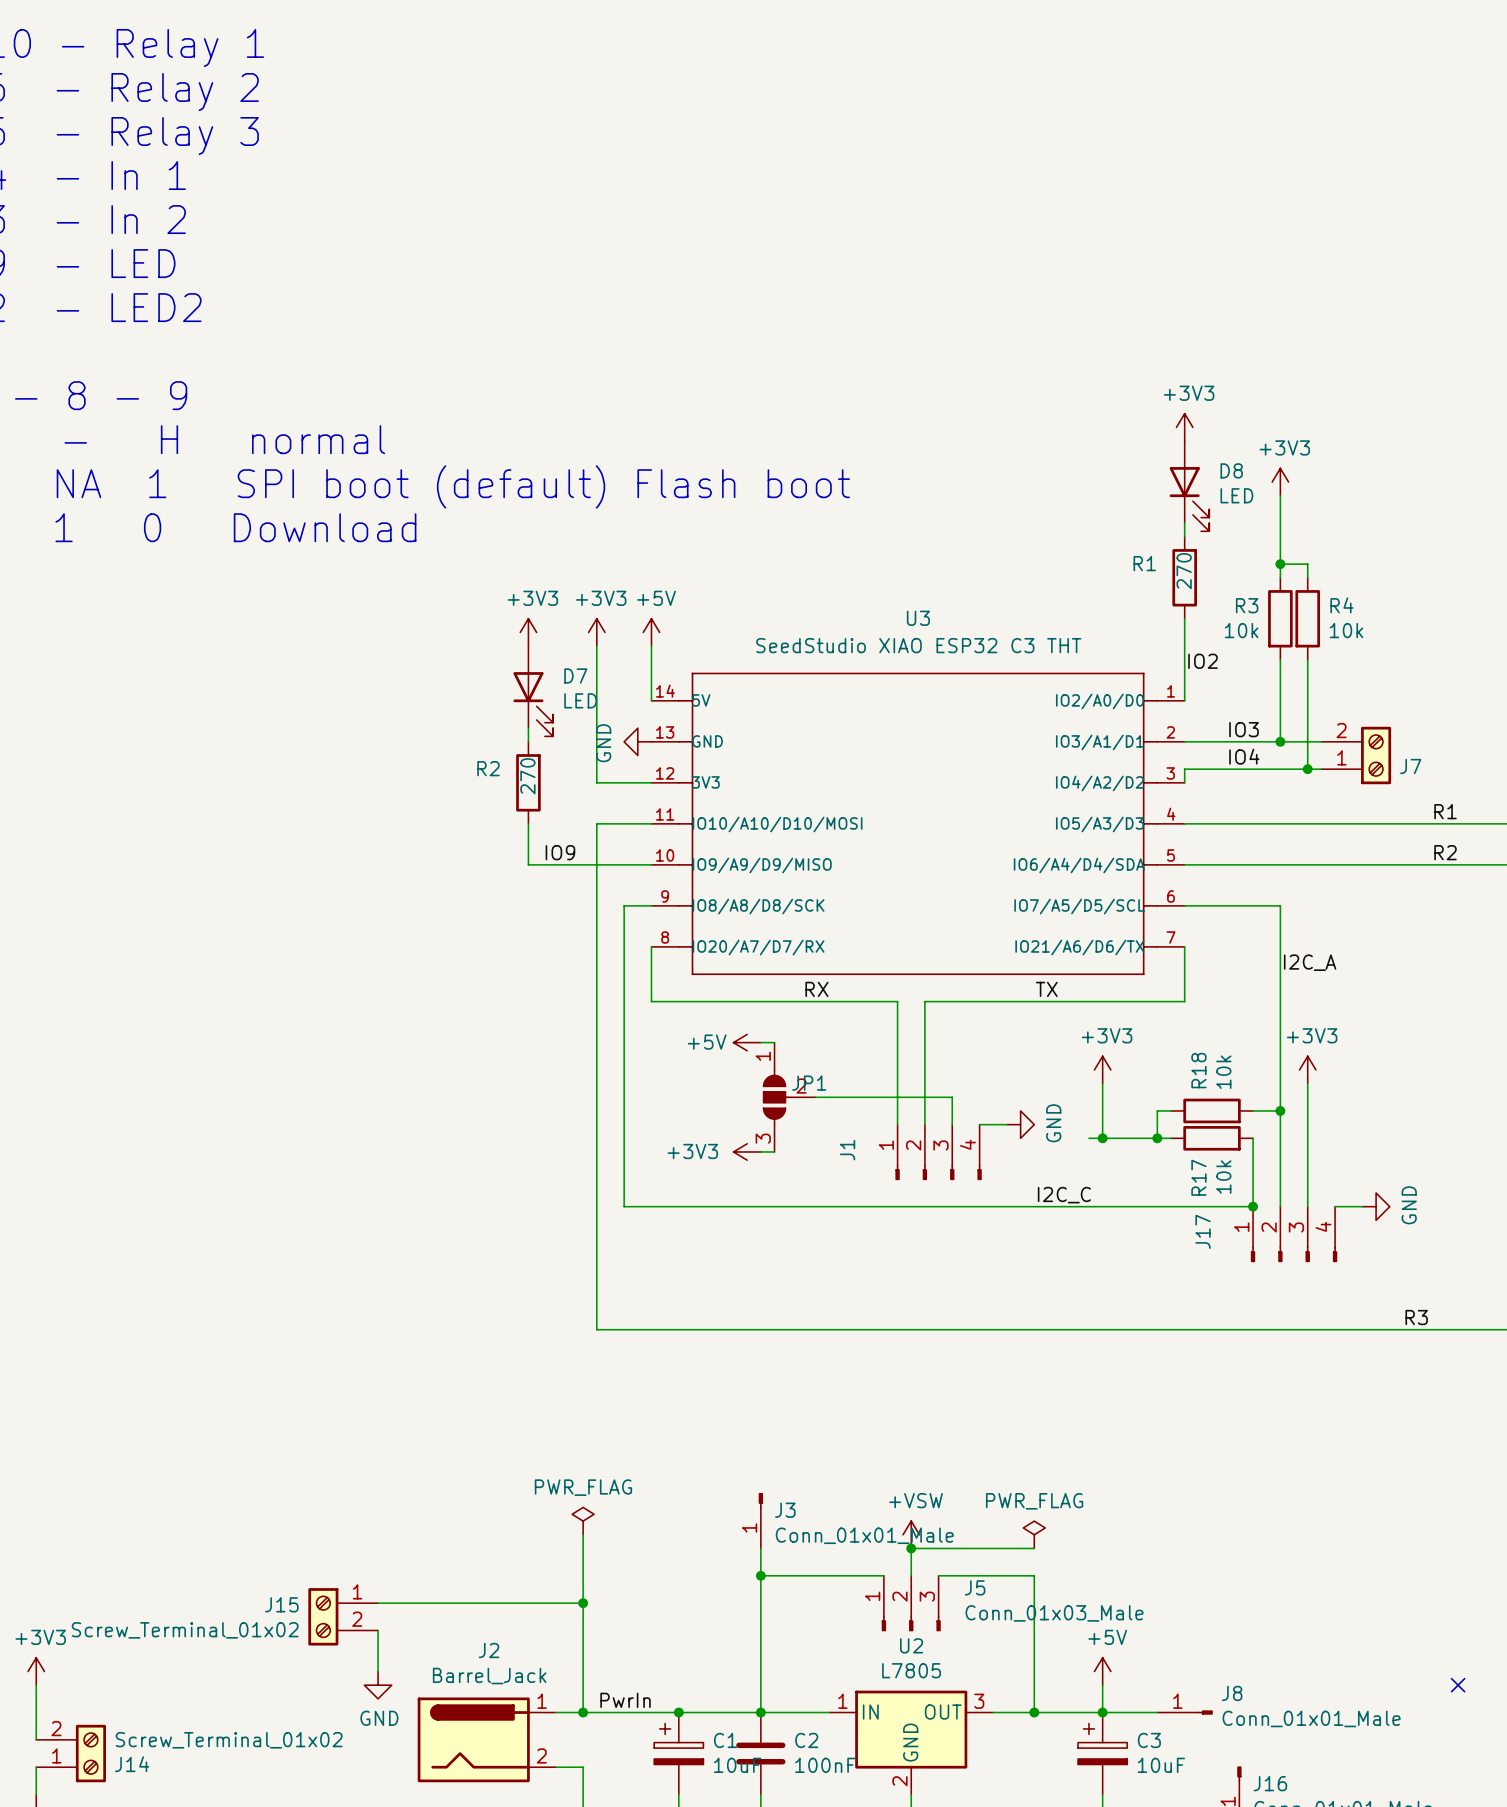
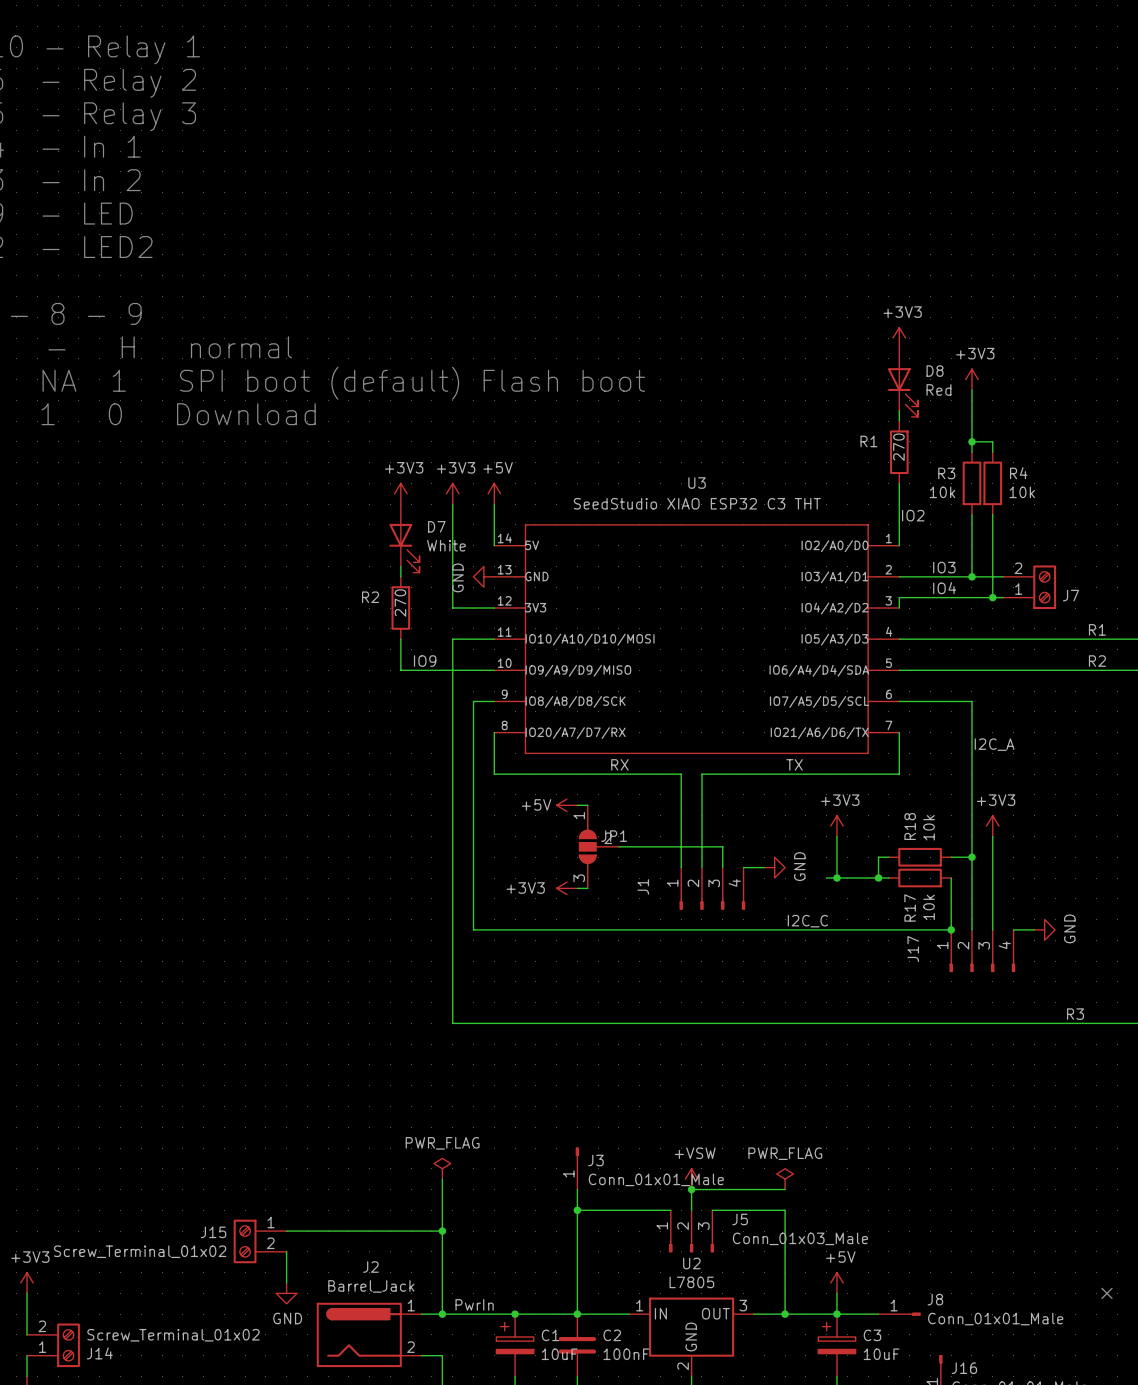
D8 value: LED (1236, 495) -> Red (938, 389)
D7 value: LED (580, 700) -> White (446, 545)

